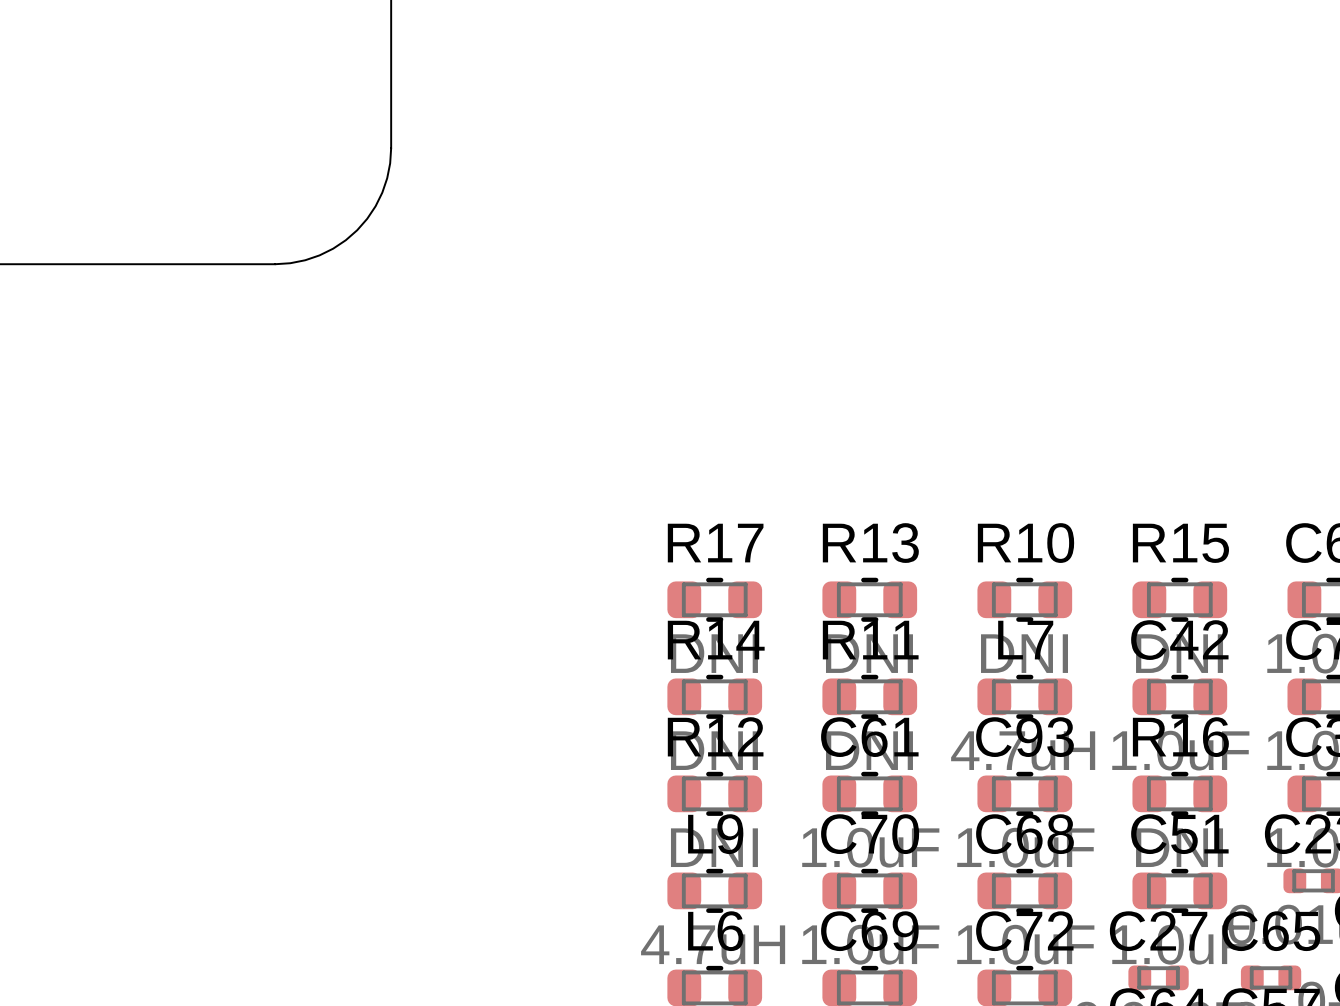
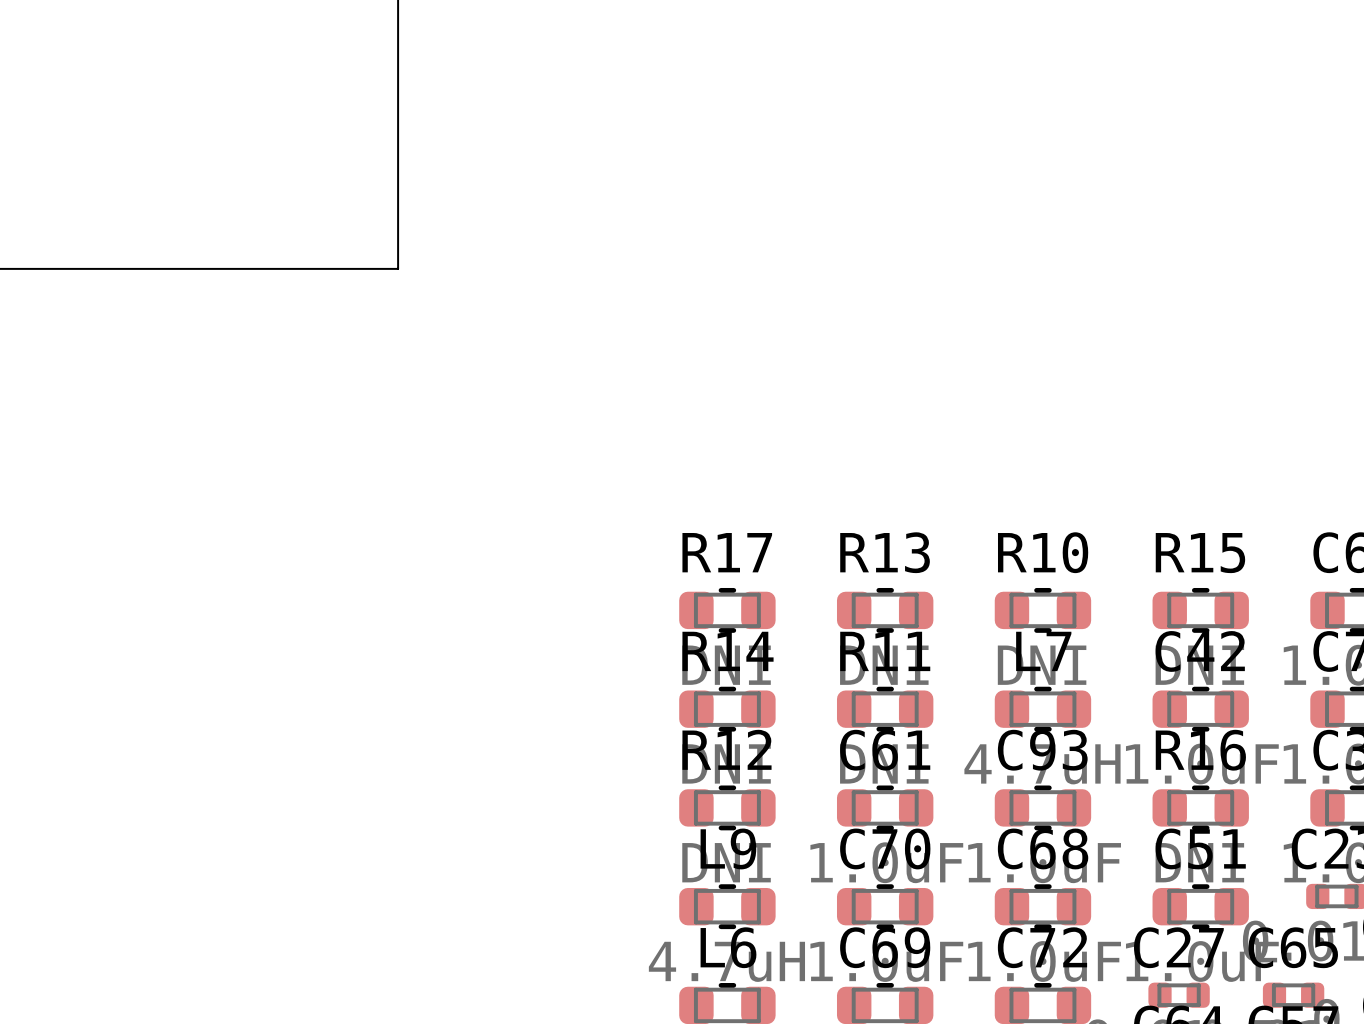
board edge: (391, 148) (390, 163) (382, 192) (367, 218) (357, 230) (345, 240) (319, 255) (290, 263) (275, 264) -> (398, 150) (398, 268) (280, 268)

